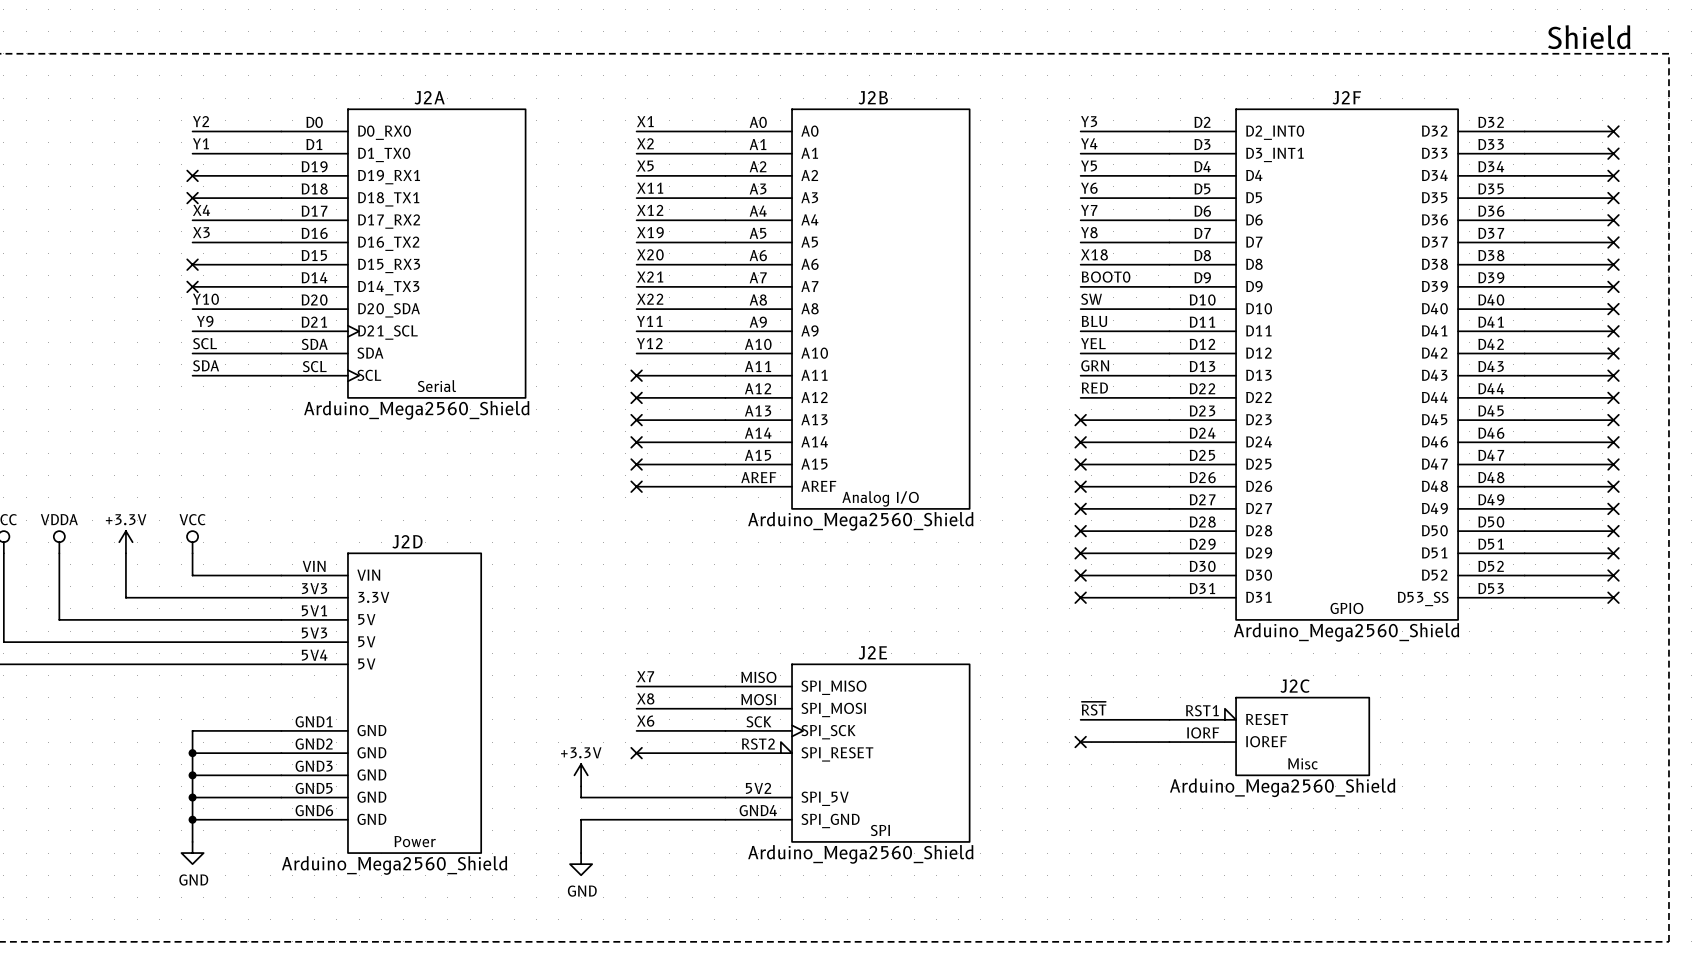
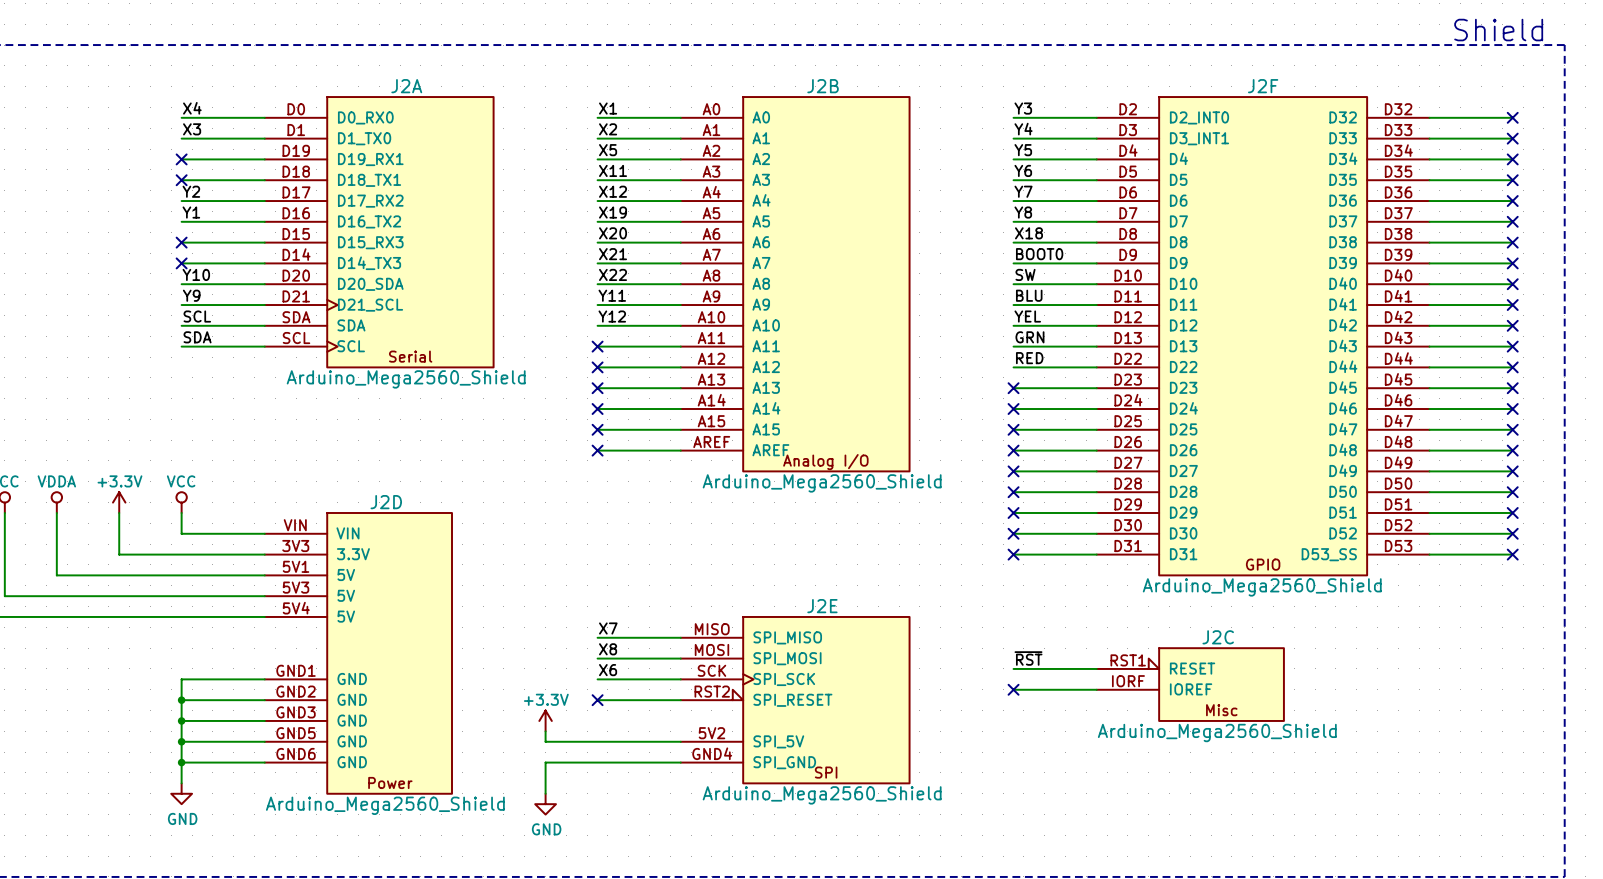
label: Y2 (201, 121) -> X4 (192, 108)
label: Y1 (200, 143) -> X3 (192, 129)
label: X4 (201, 210) -> Y2 (191, 191)
label: X3 (201, 232) -> Y1 (191, 212)

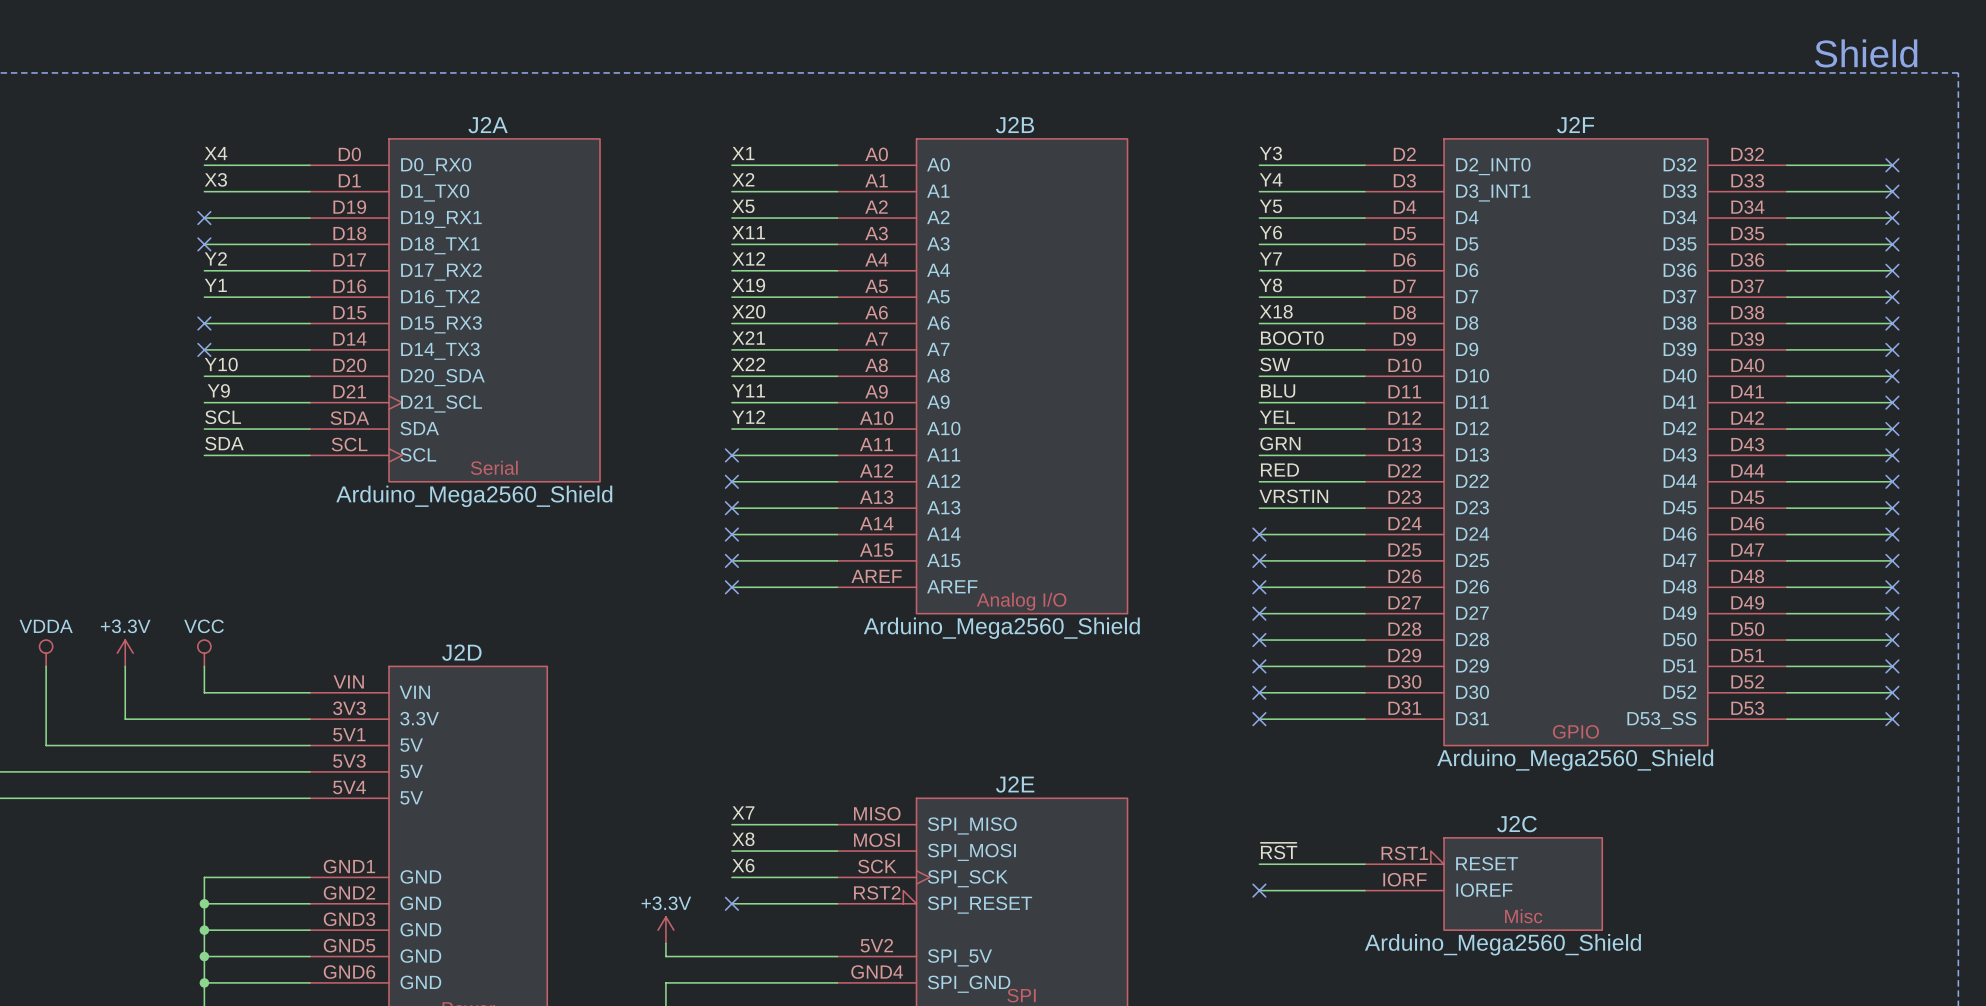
label: none -> VRSTIN (1293, 496)
no-connect mark: (1013, 388) -> none

